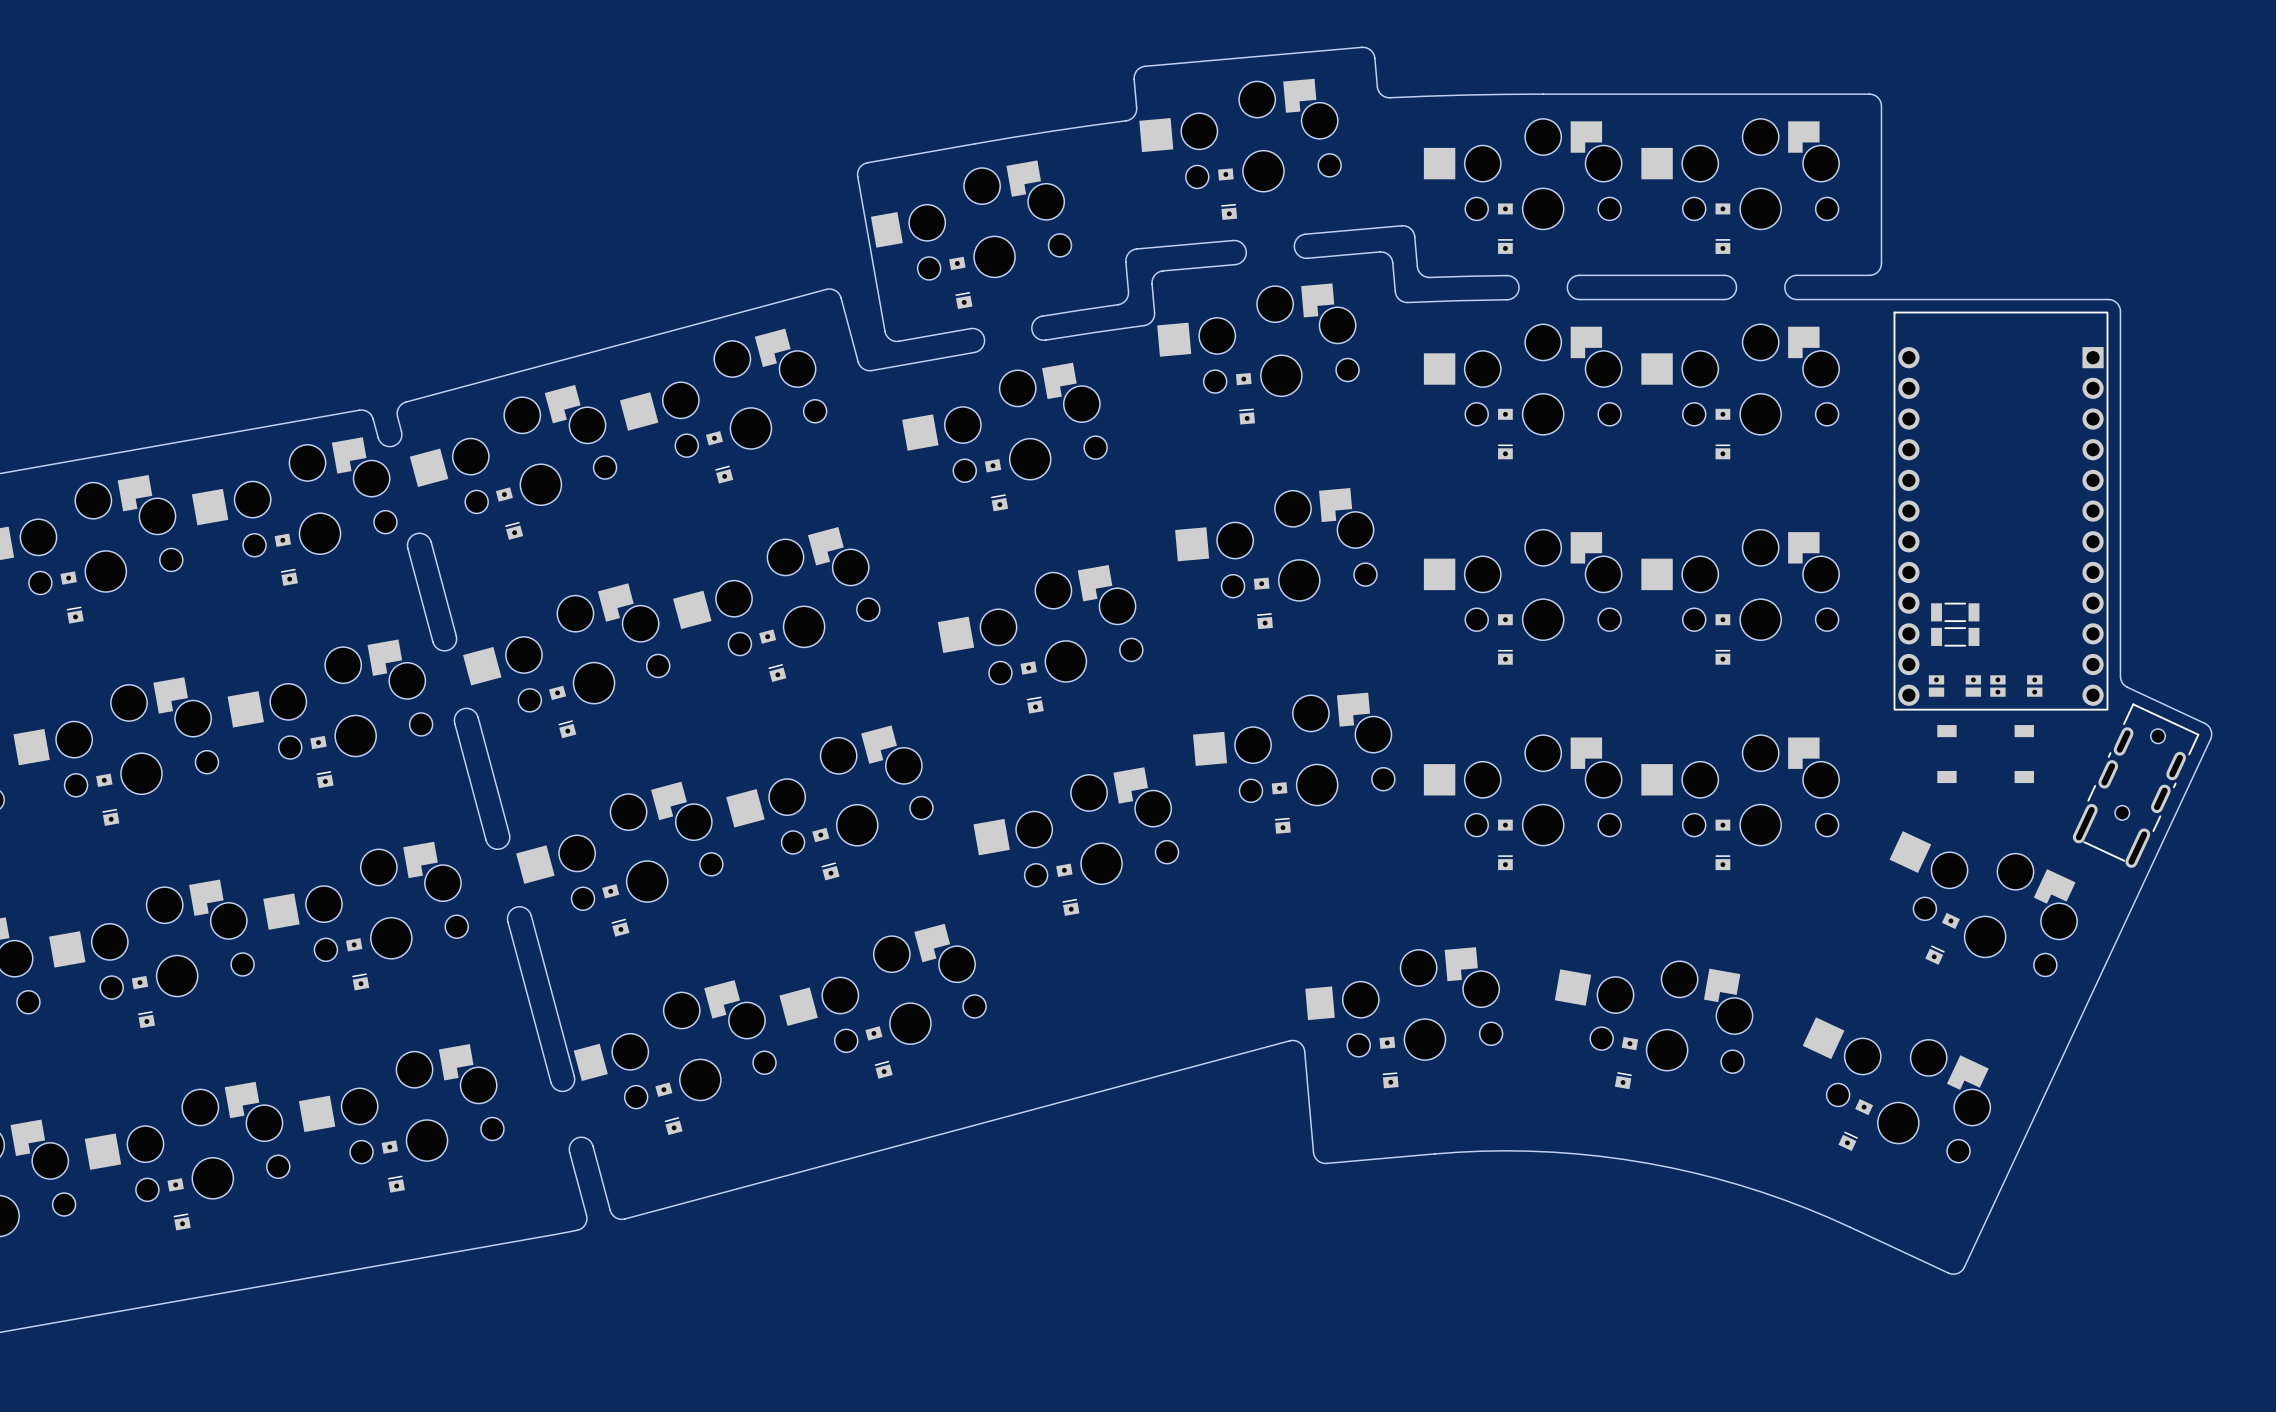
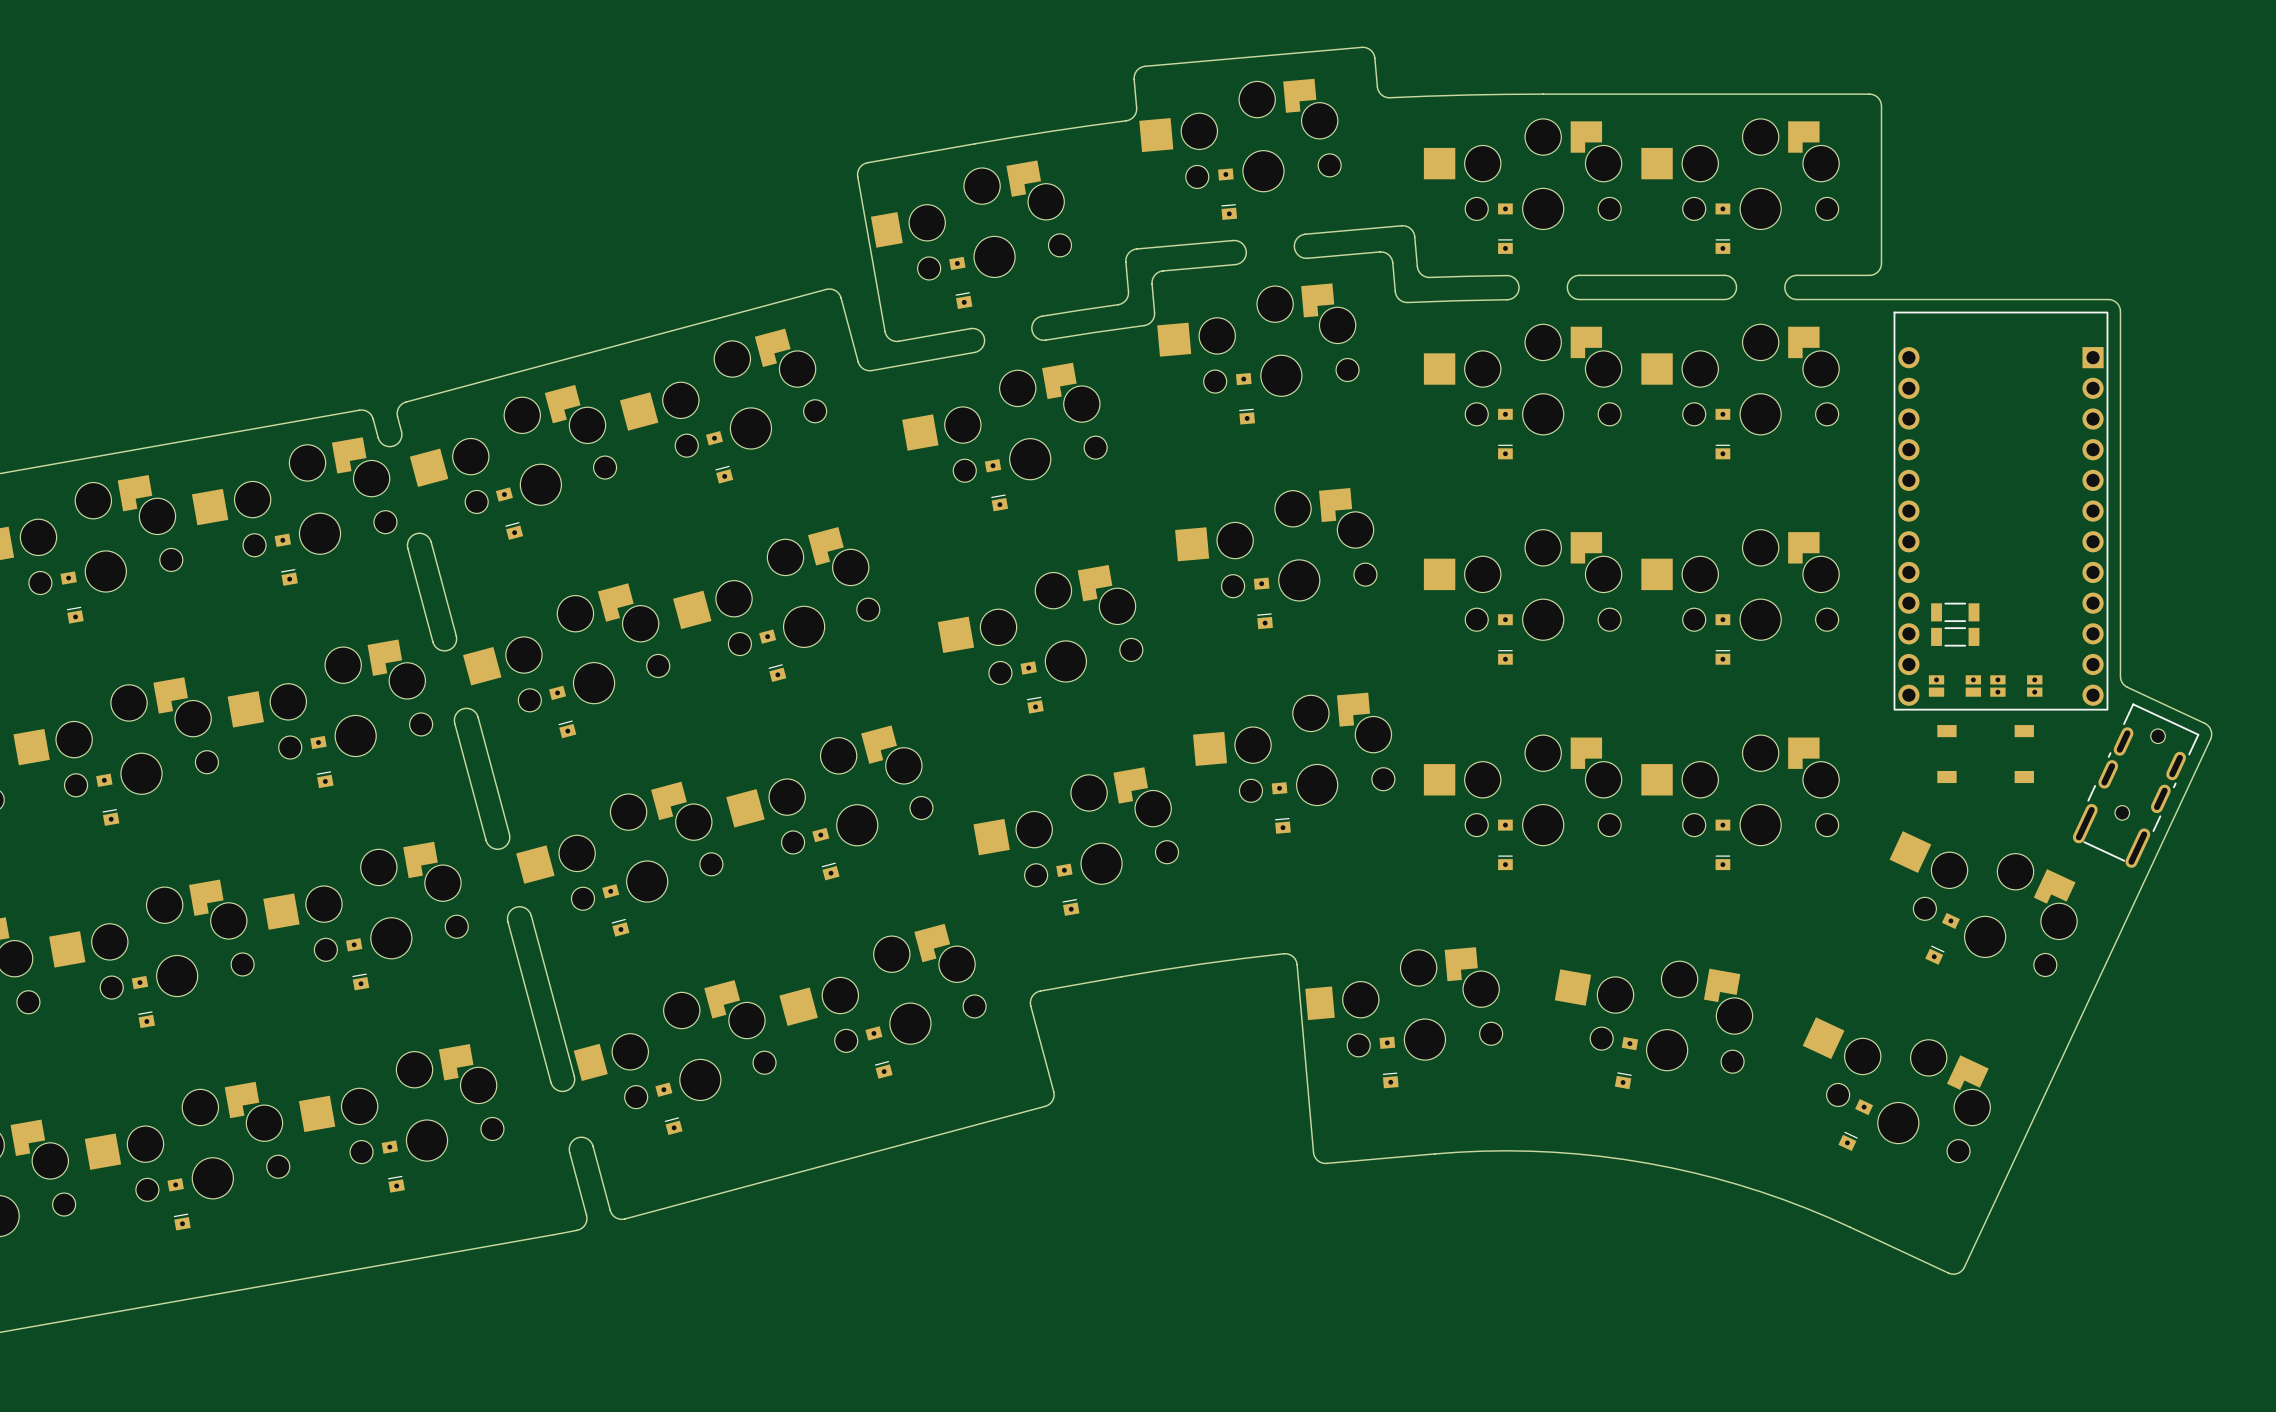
board edge: (1304, 1051) (1299, 1042) (1289, 1040) (1045, 1106) -> (1304, 1051) (1296, 963) (1293, 957) (1287, 954) (1202, 963) (1040, 991) (1033, 995) (1030, 1003) (1054, 1093) (1051, 1102) (1045, 1106)

